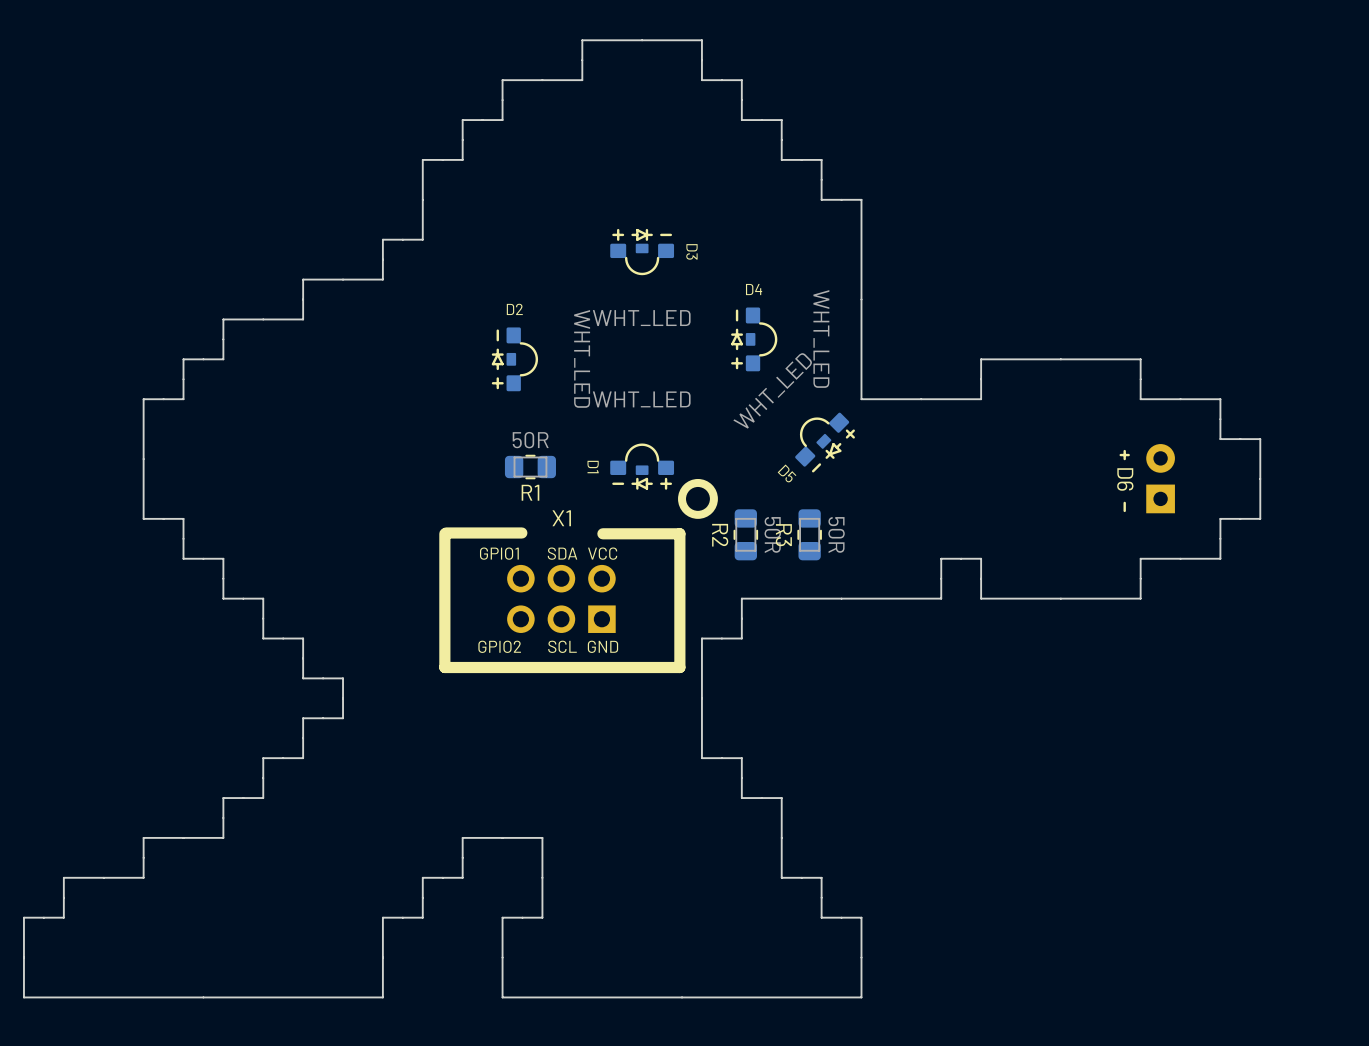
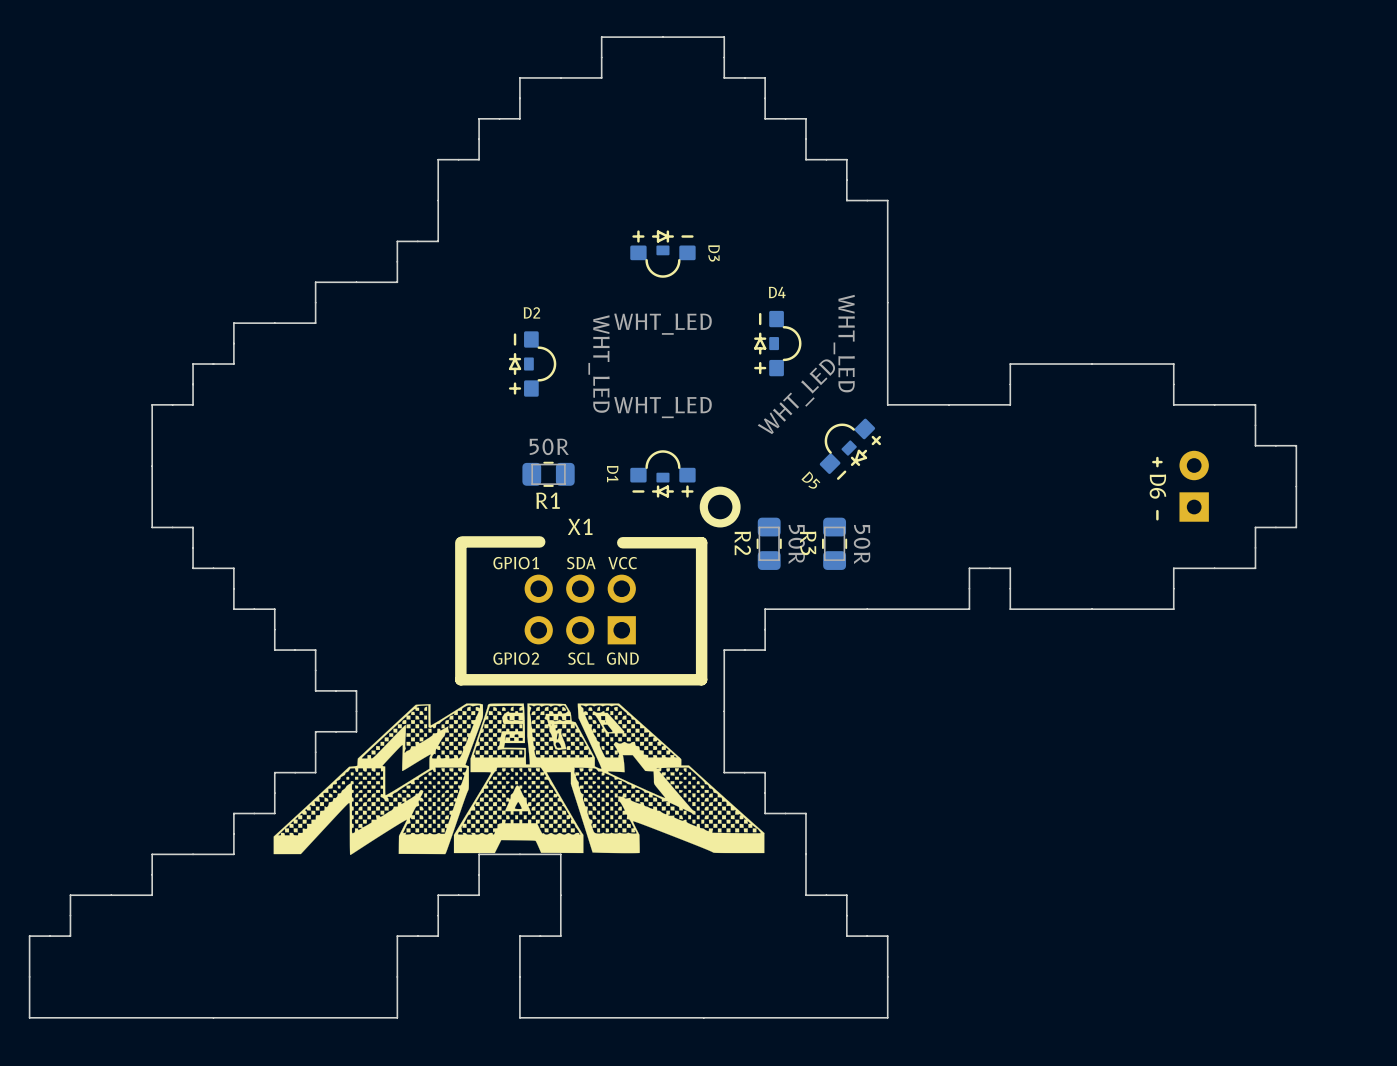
drawing: none -> [273, 703, 765, 855]

